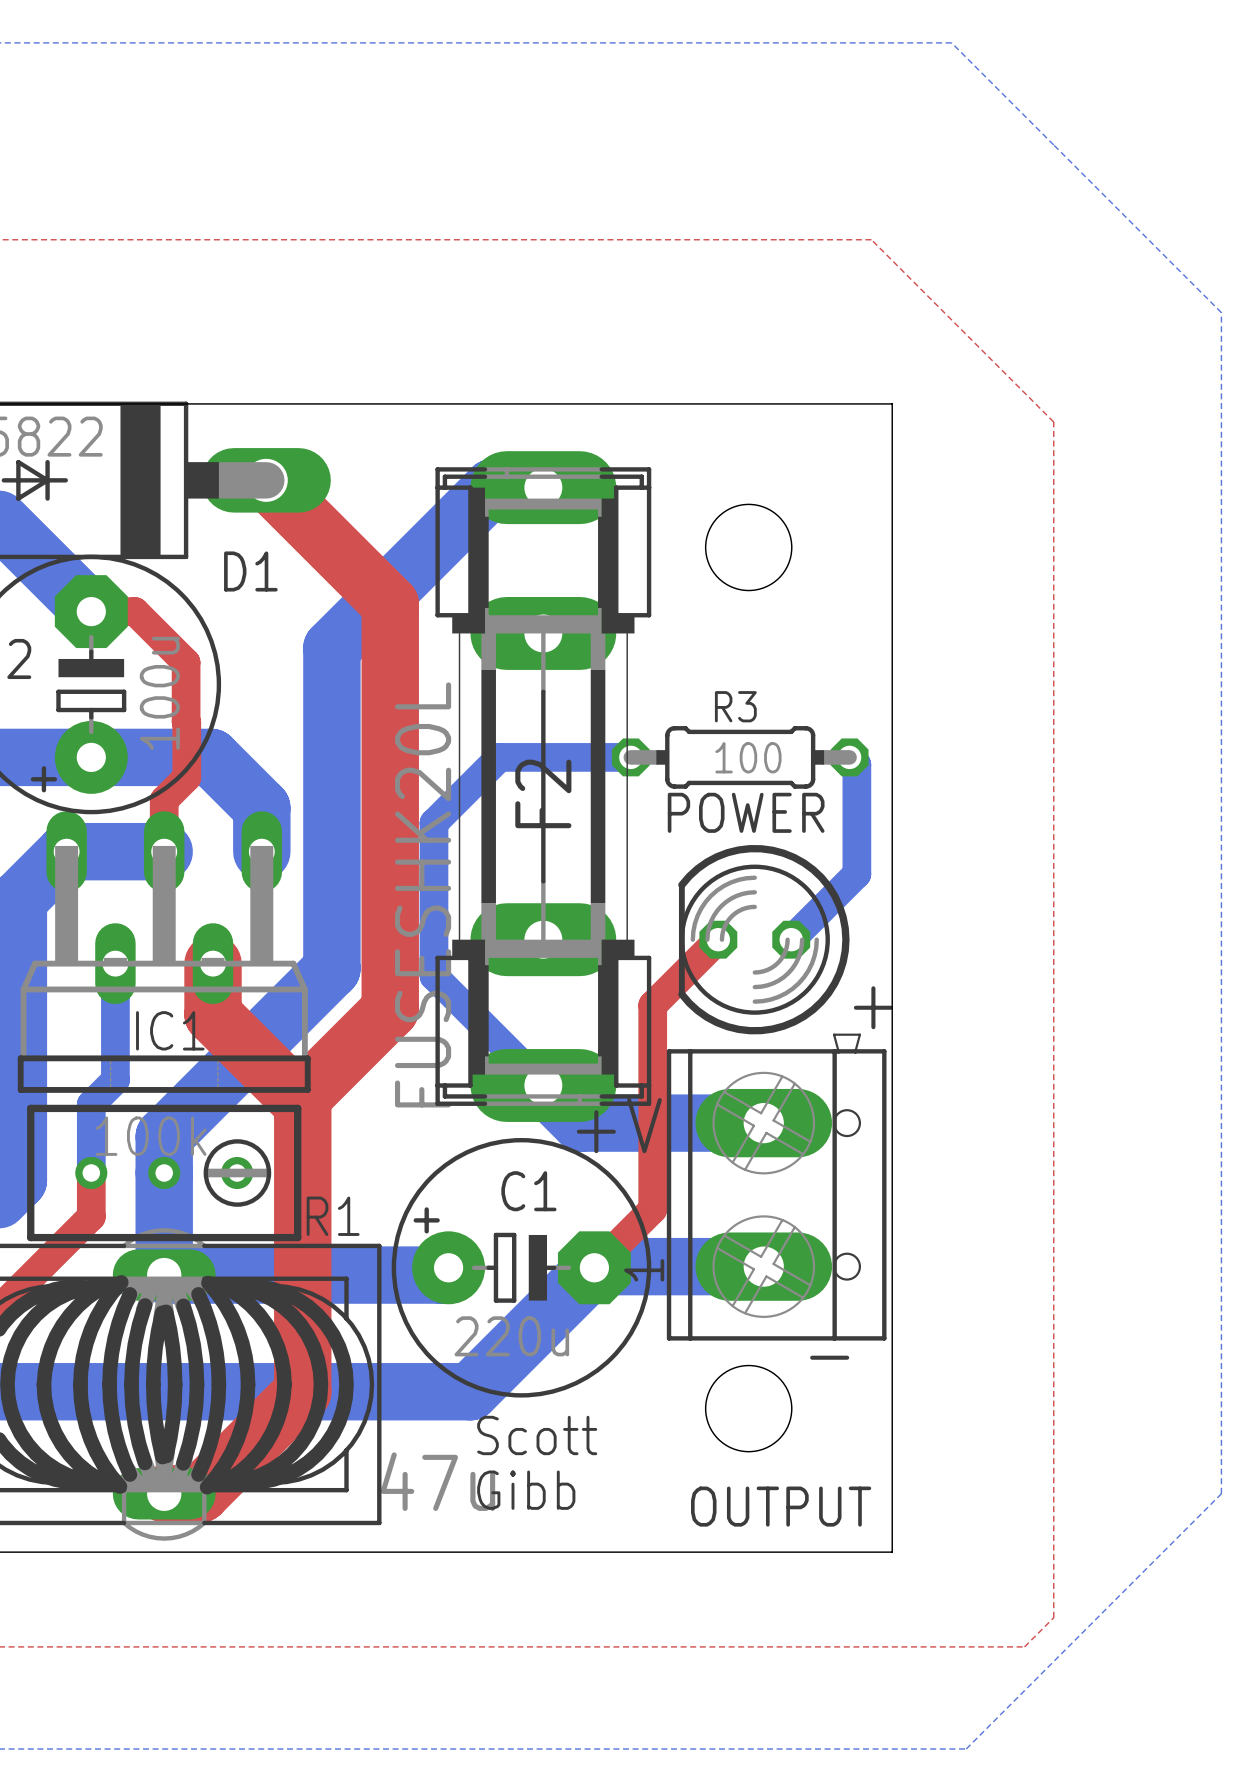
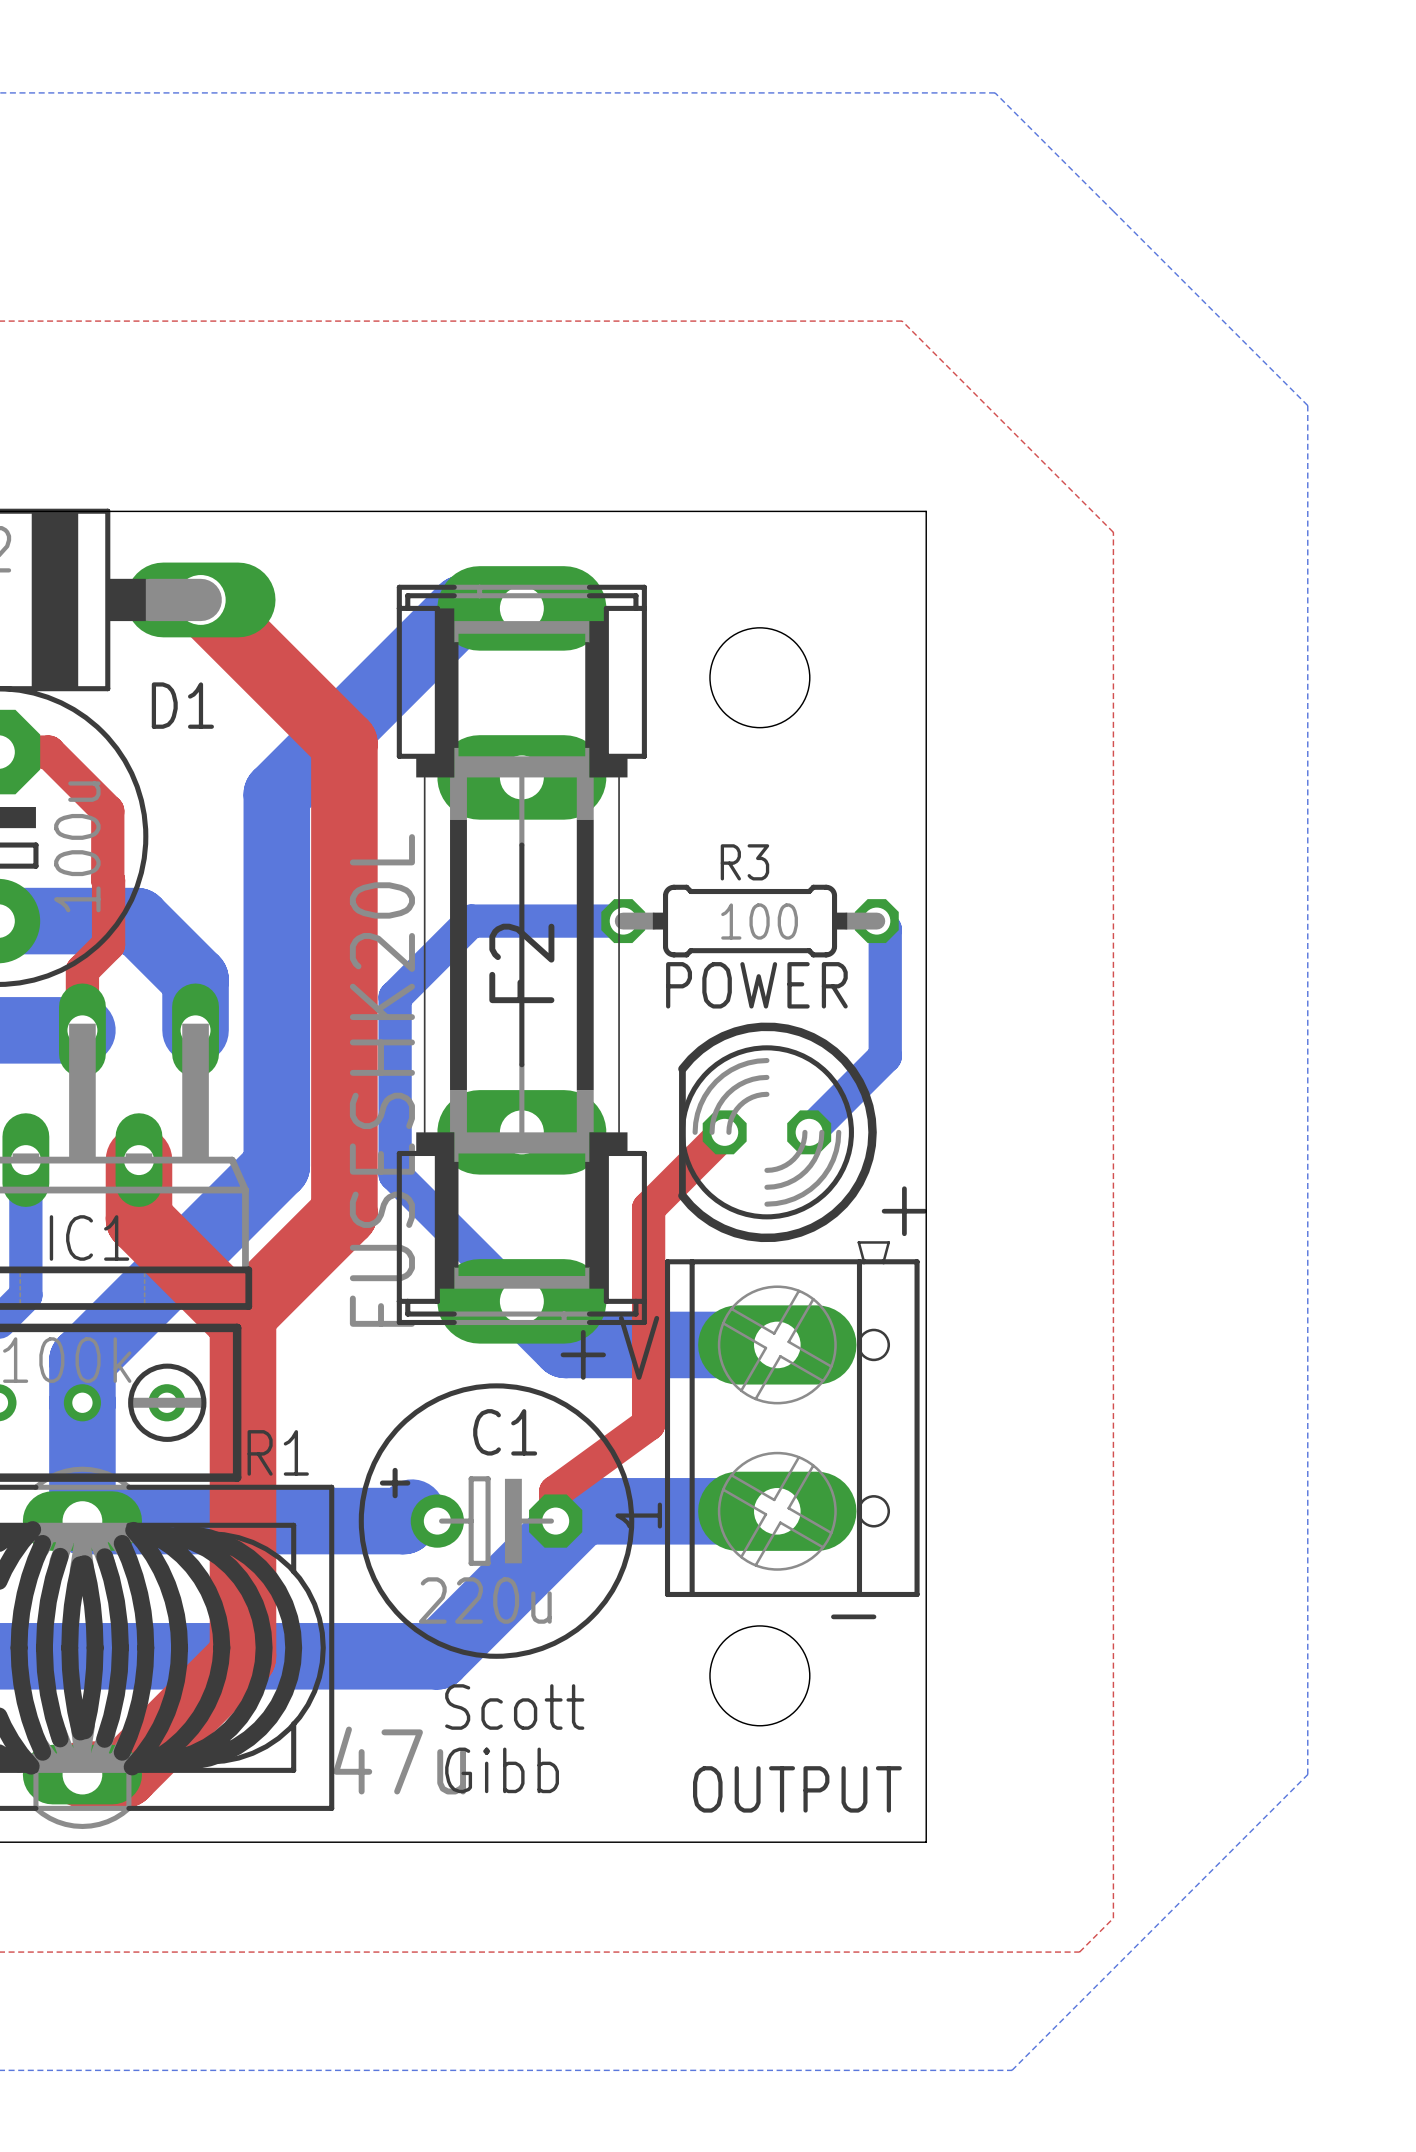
C1 footprint: [391, 1138, 652, 1398] -> [358, 1383, 635, 1659]
top track: (652, 1191) (652, 1209) (594, 1267) -> (648, 1424) (555, 1491) (555, 1521)

